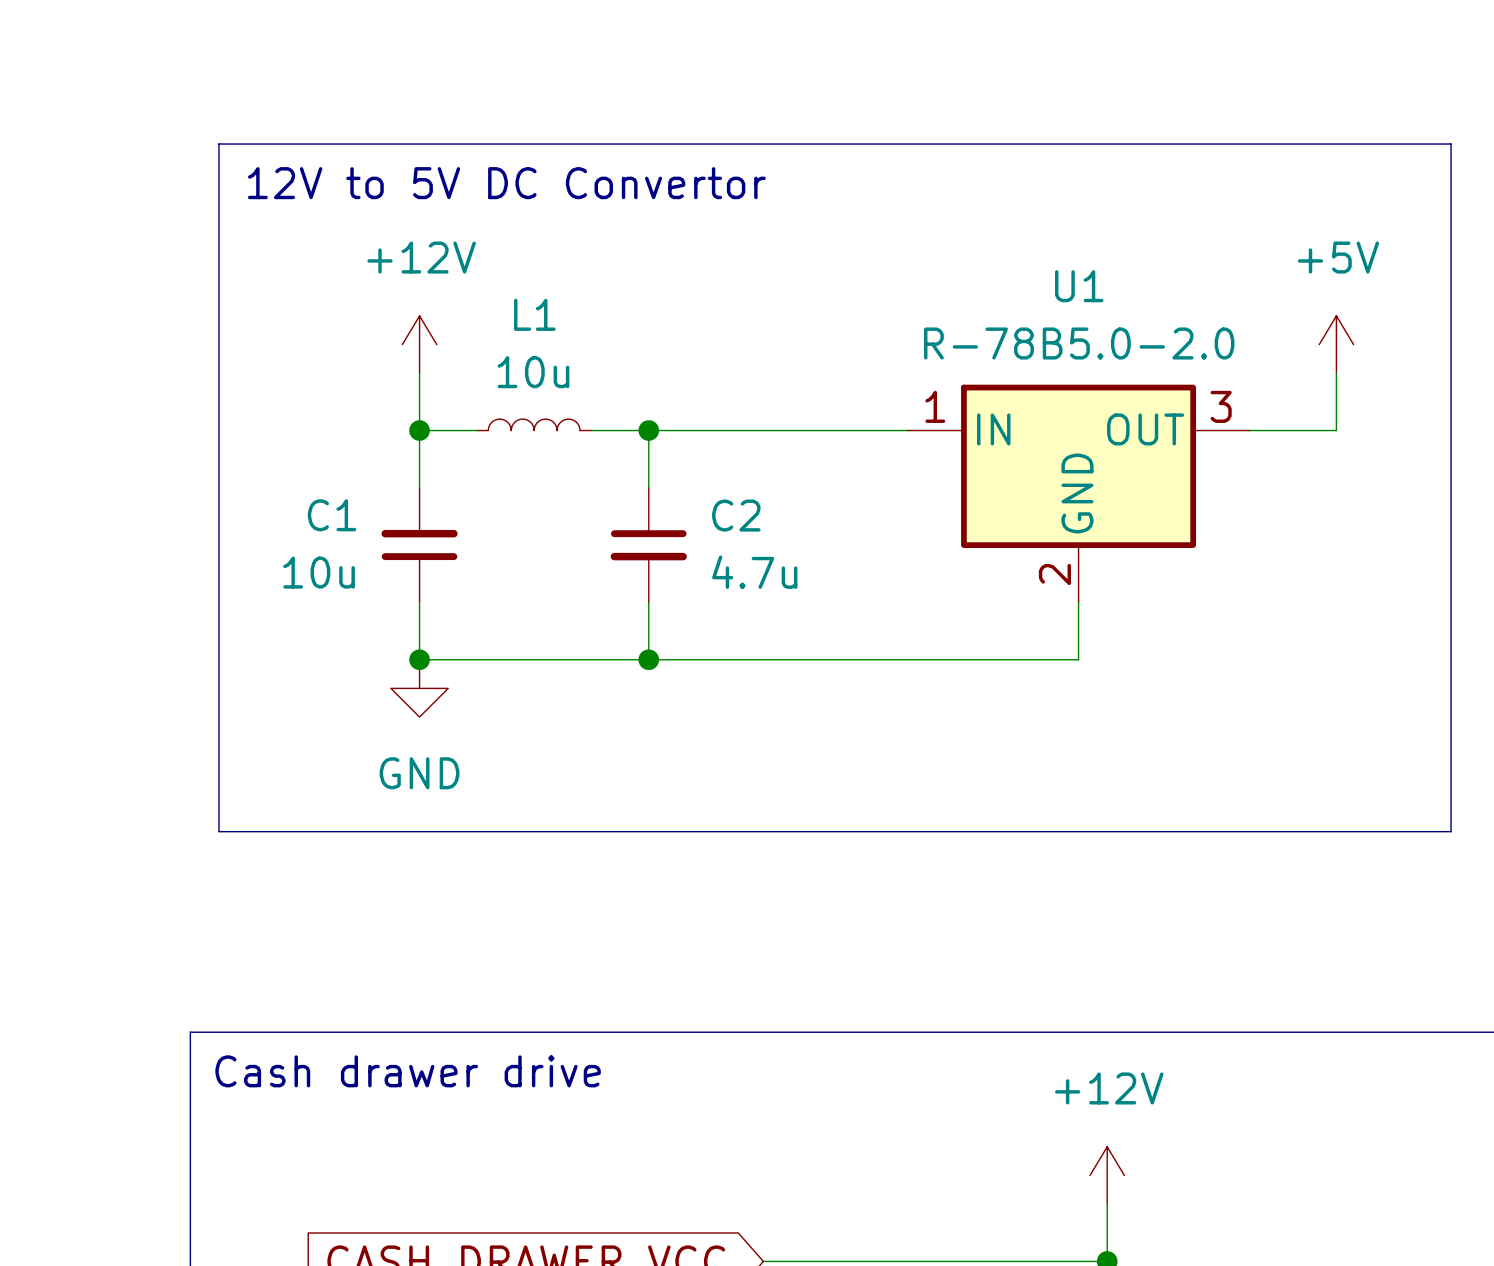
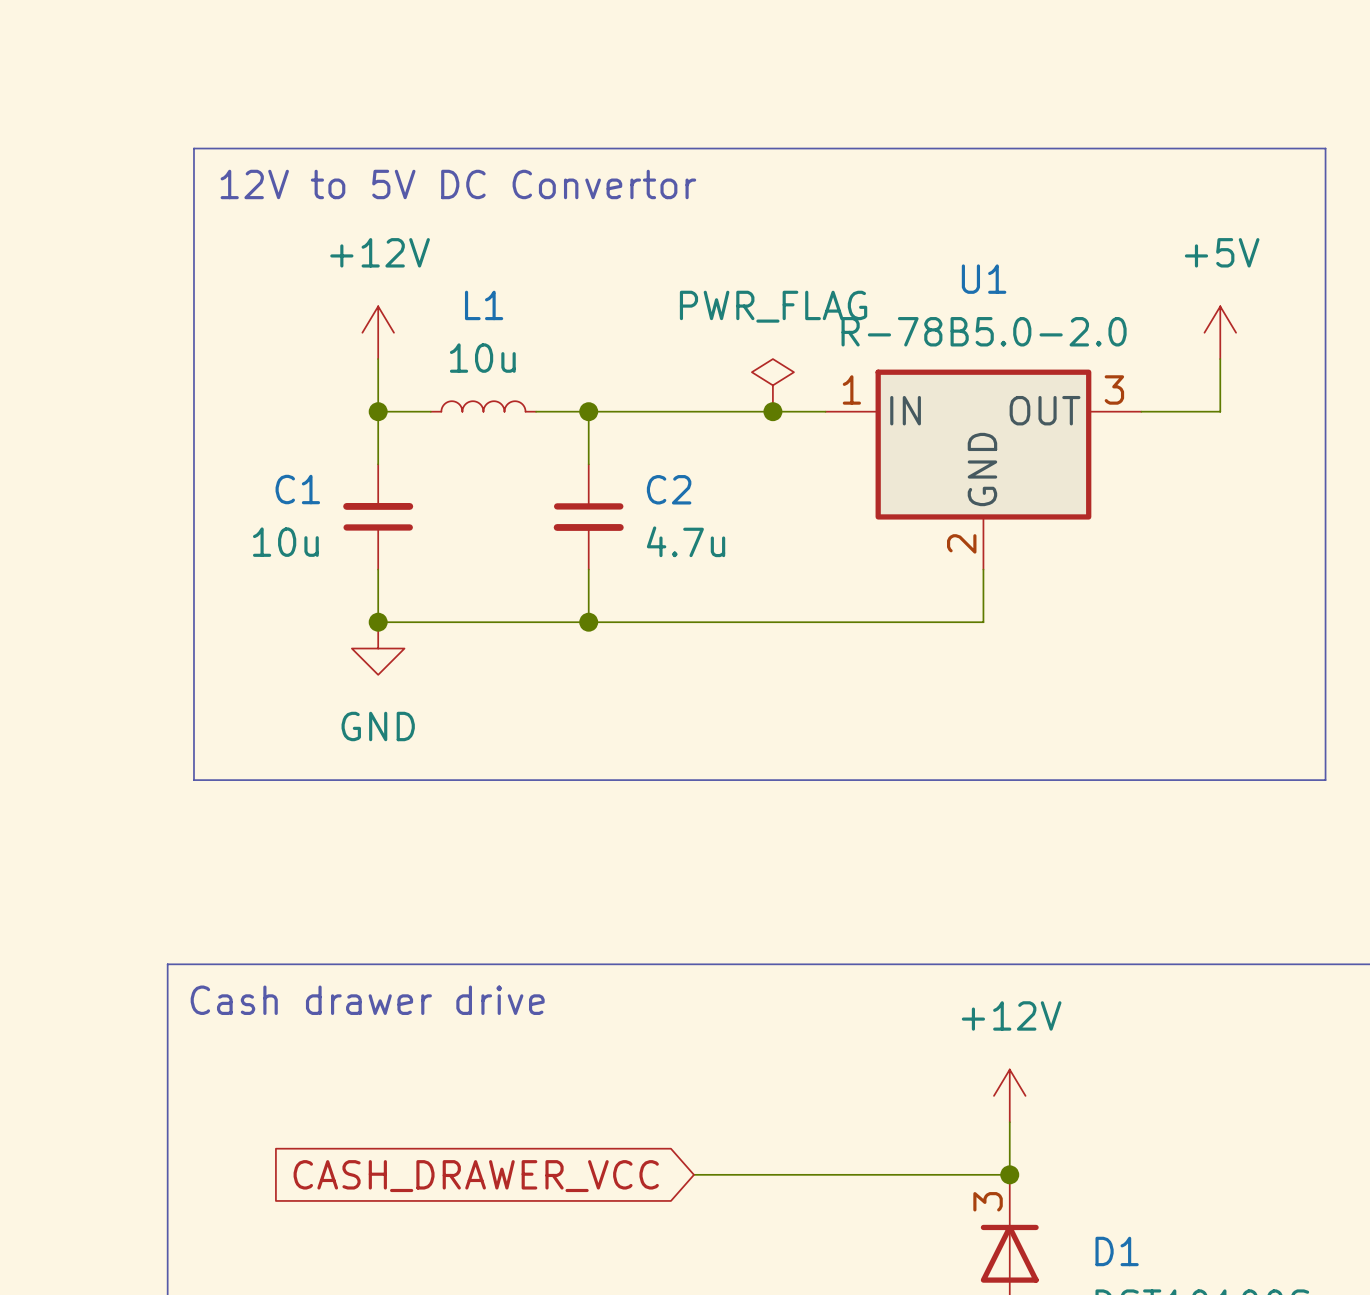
power symbol: none -> PWR_FLAG (772, 385)
junction: none -> (772, 411)

